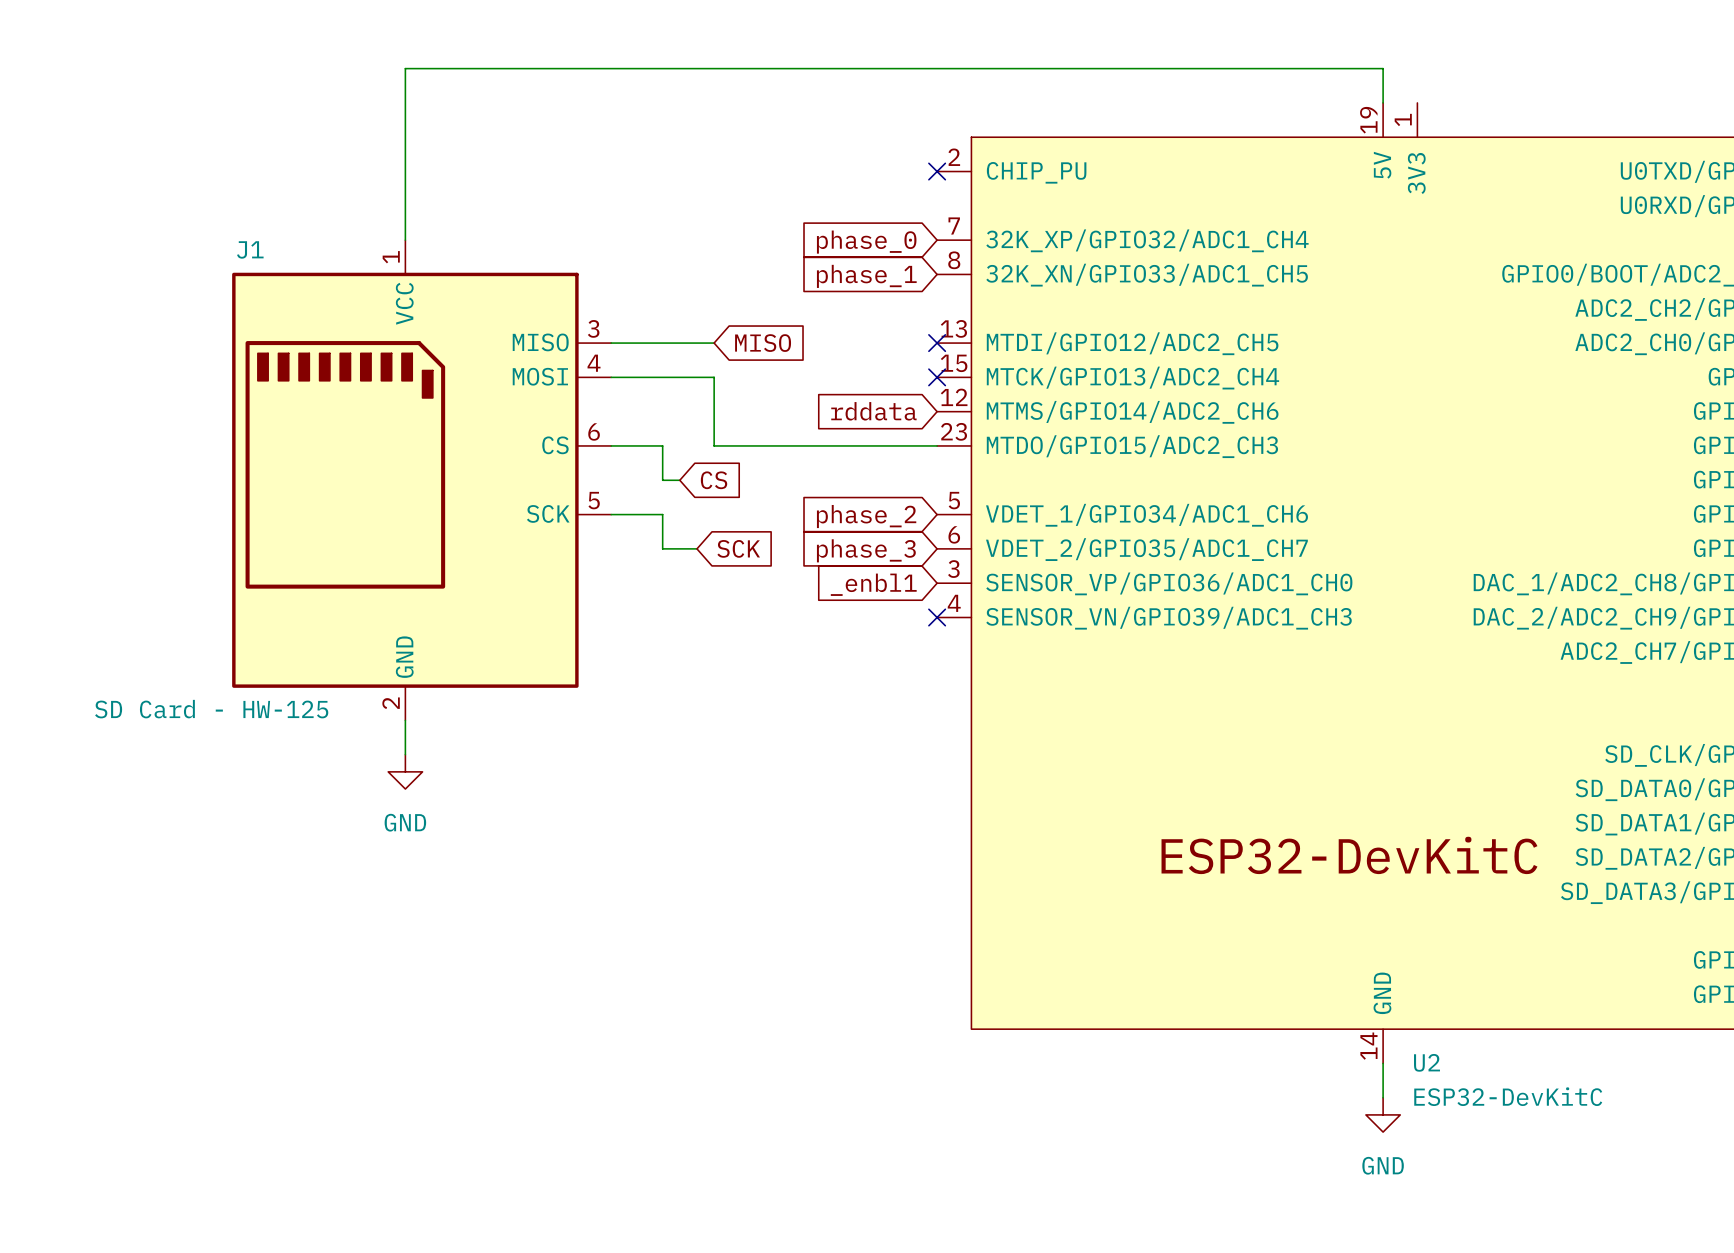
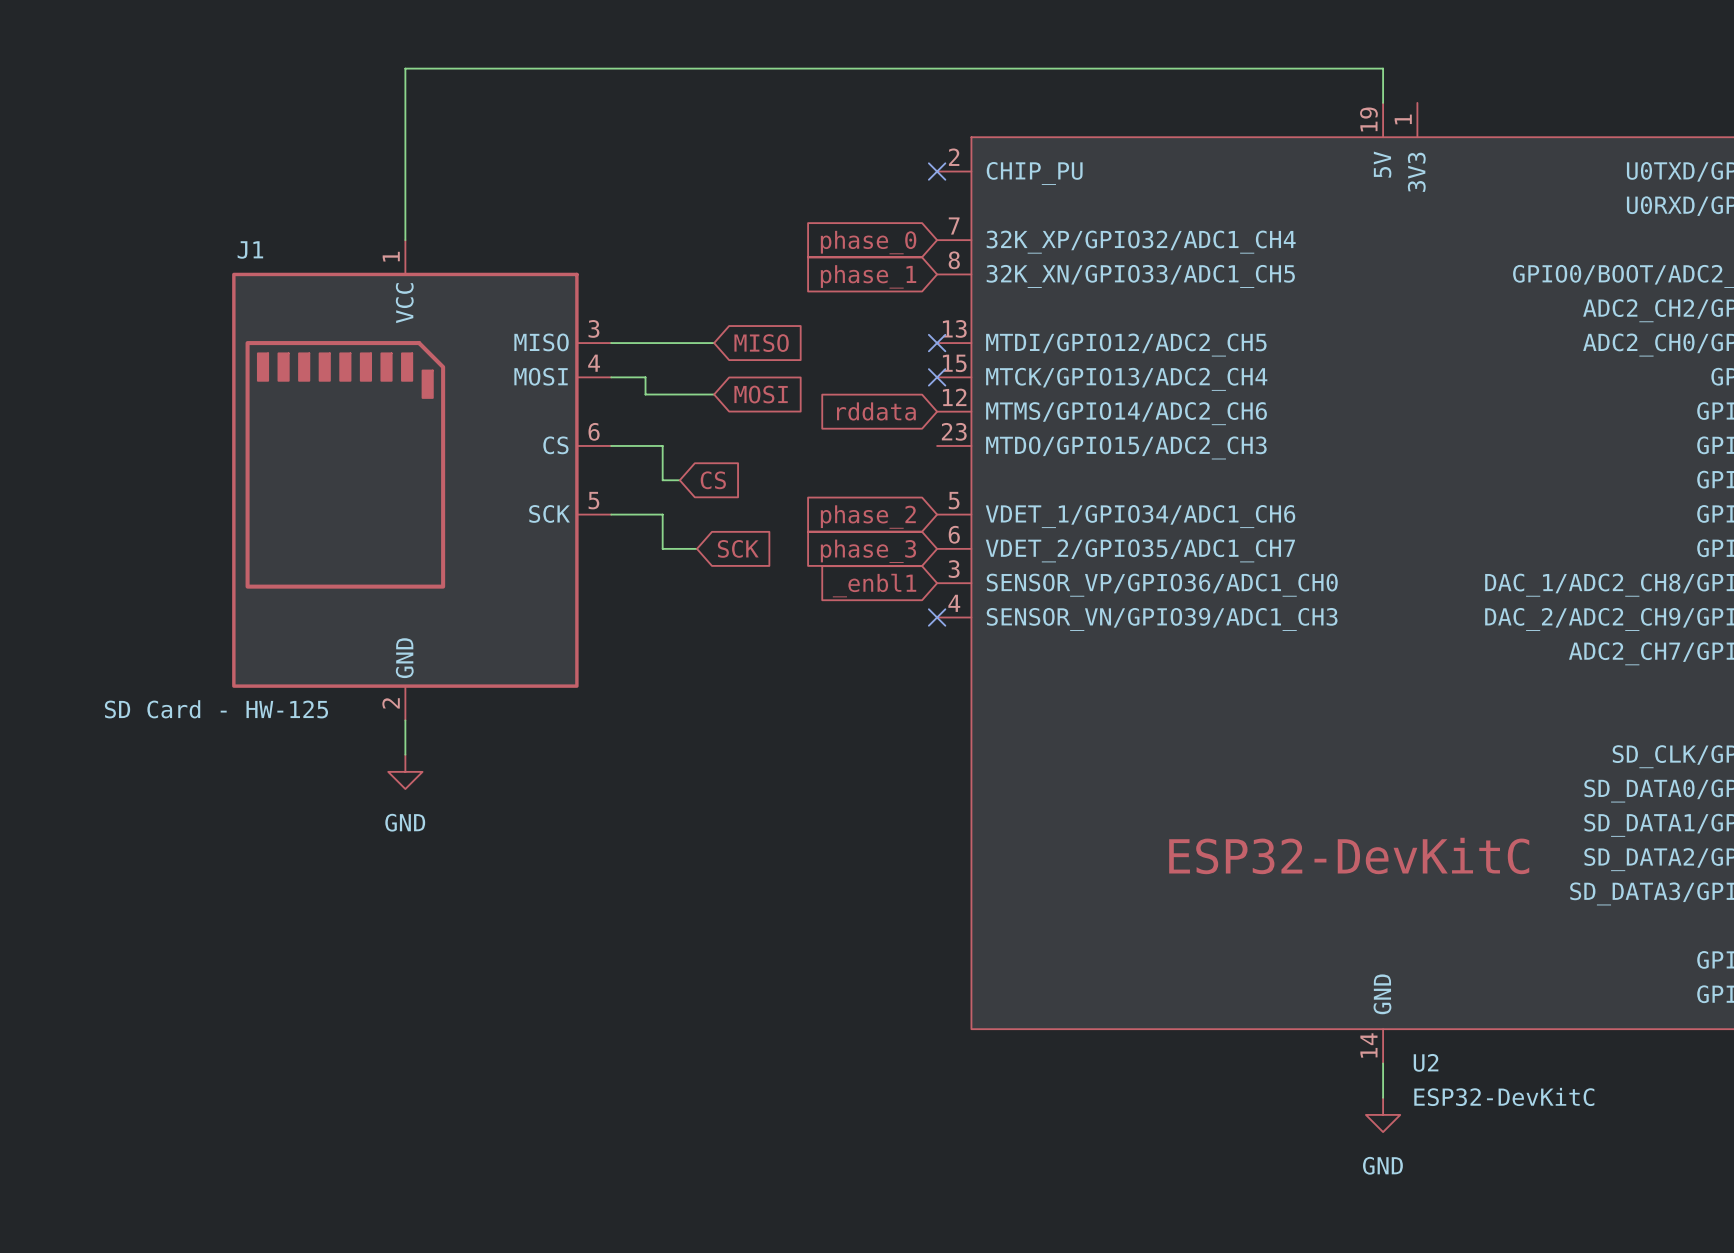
wire: (645, 377) (714, 377) (714, 445) (937, 445) -> (645, 377) (645, 394) (714, 394)
global label: none -> MOSI (761, 394)

